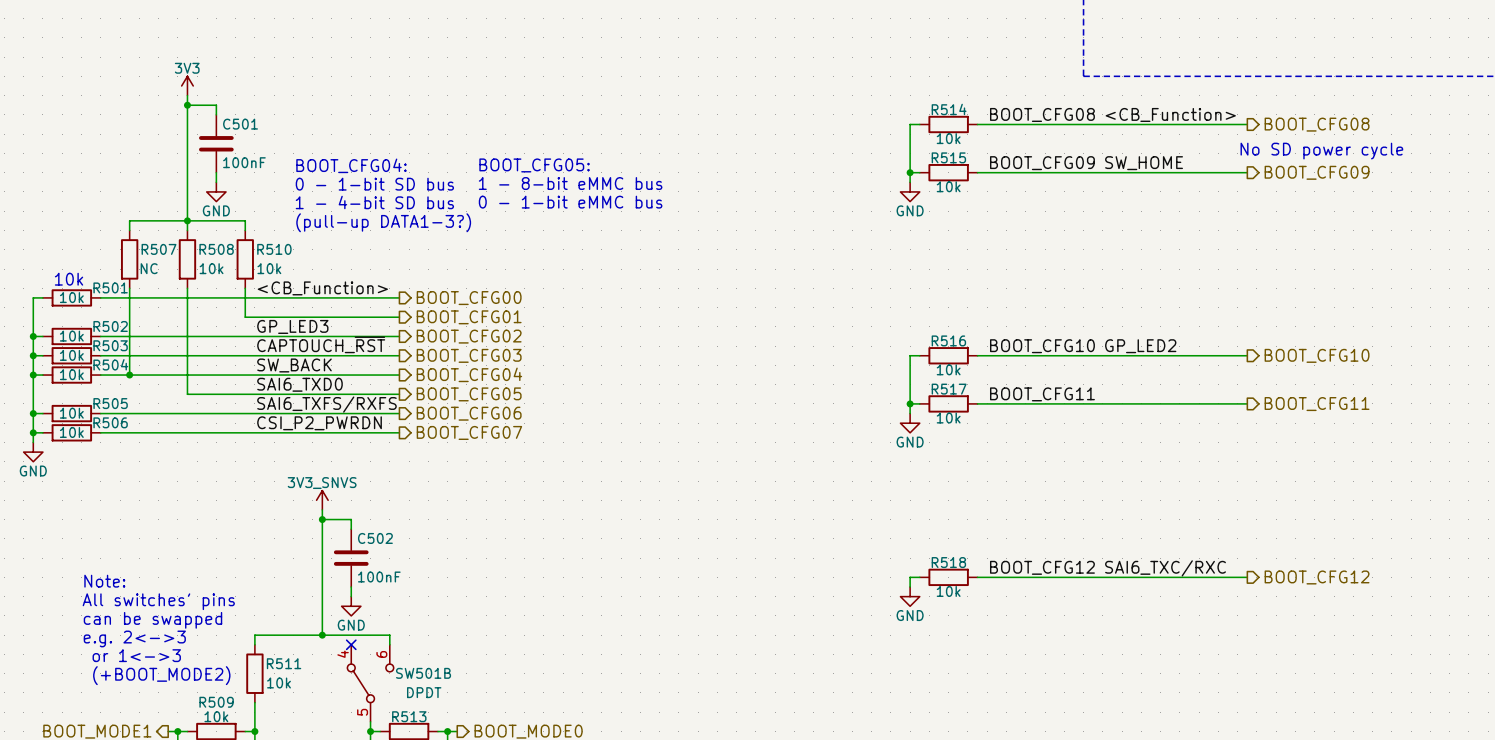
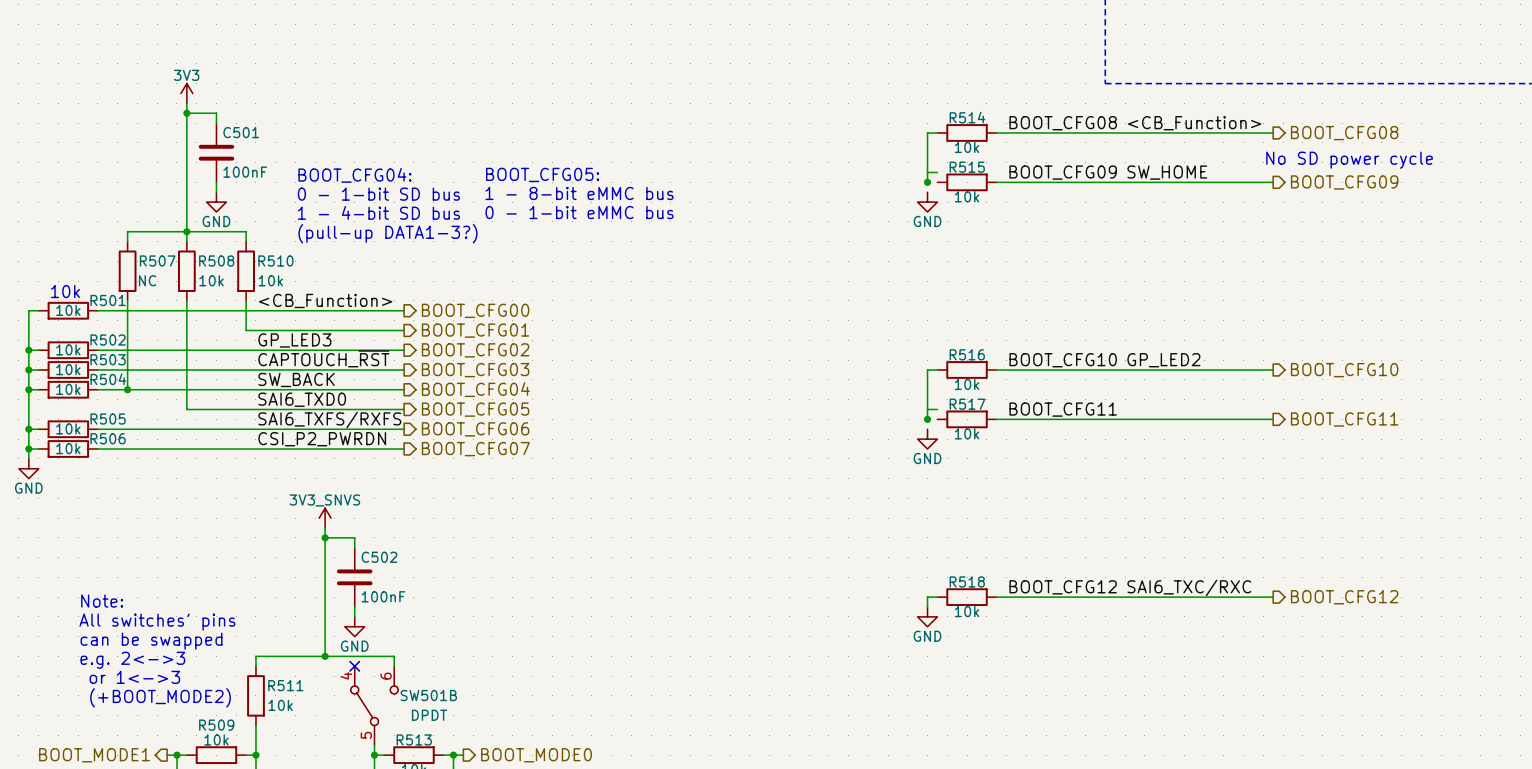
wire: none -> (927, 172) (937, 172)
wire: (919, 172) (910, 172) (910, 182) -> none
wire: none -> (927, 409) (937, 409)
wire: (919, 403) (910, 403) (910, 413) -> none

